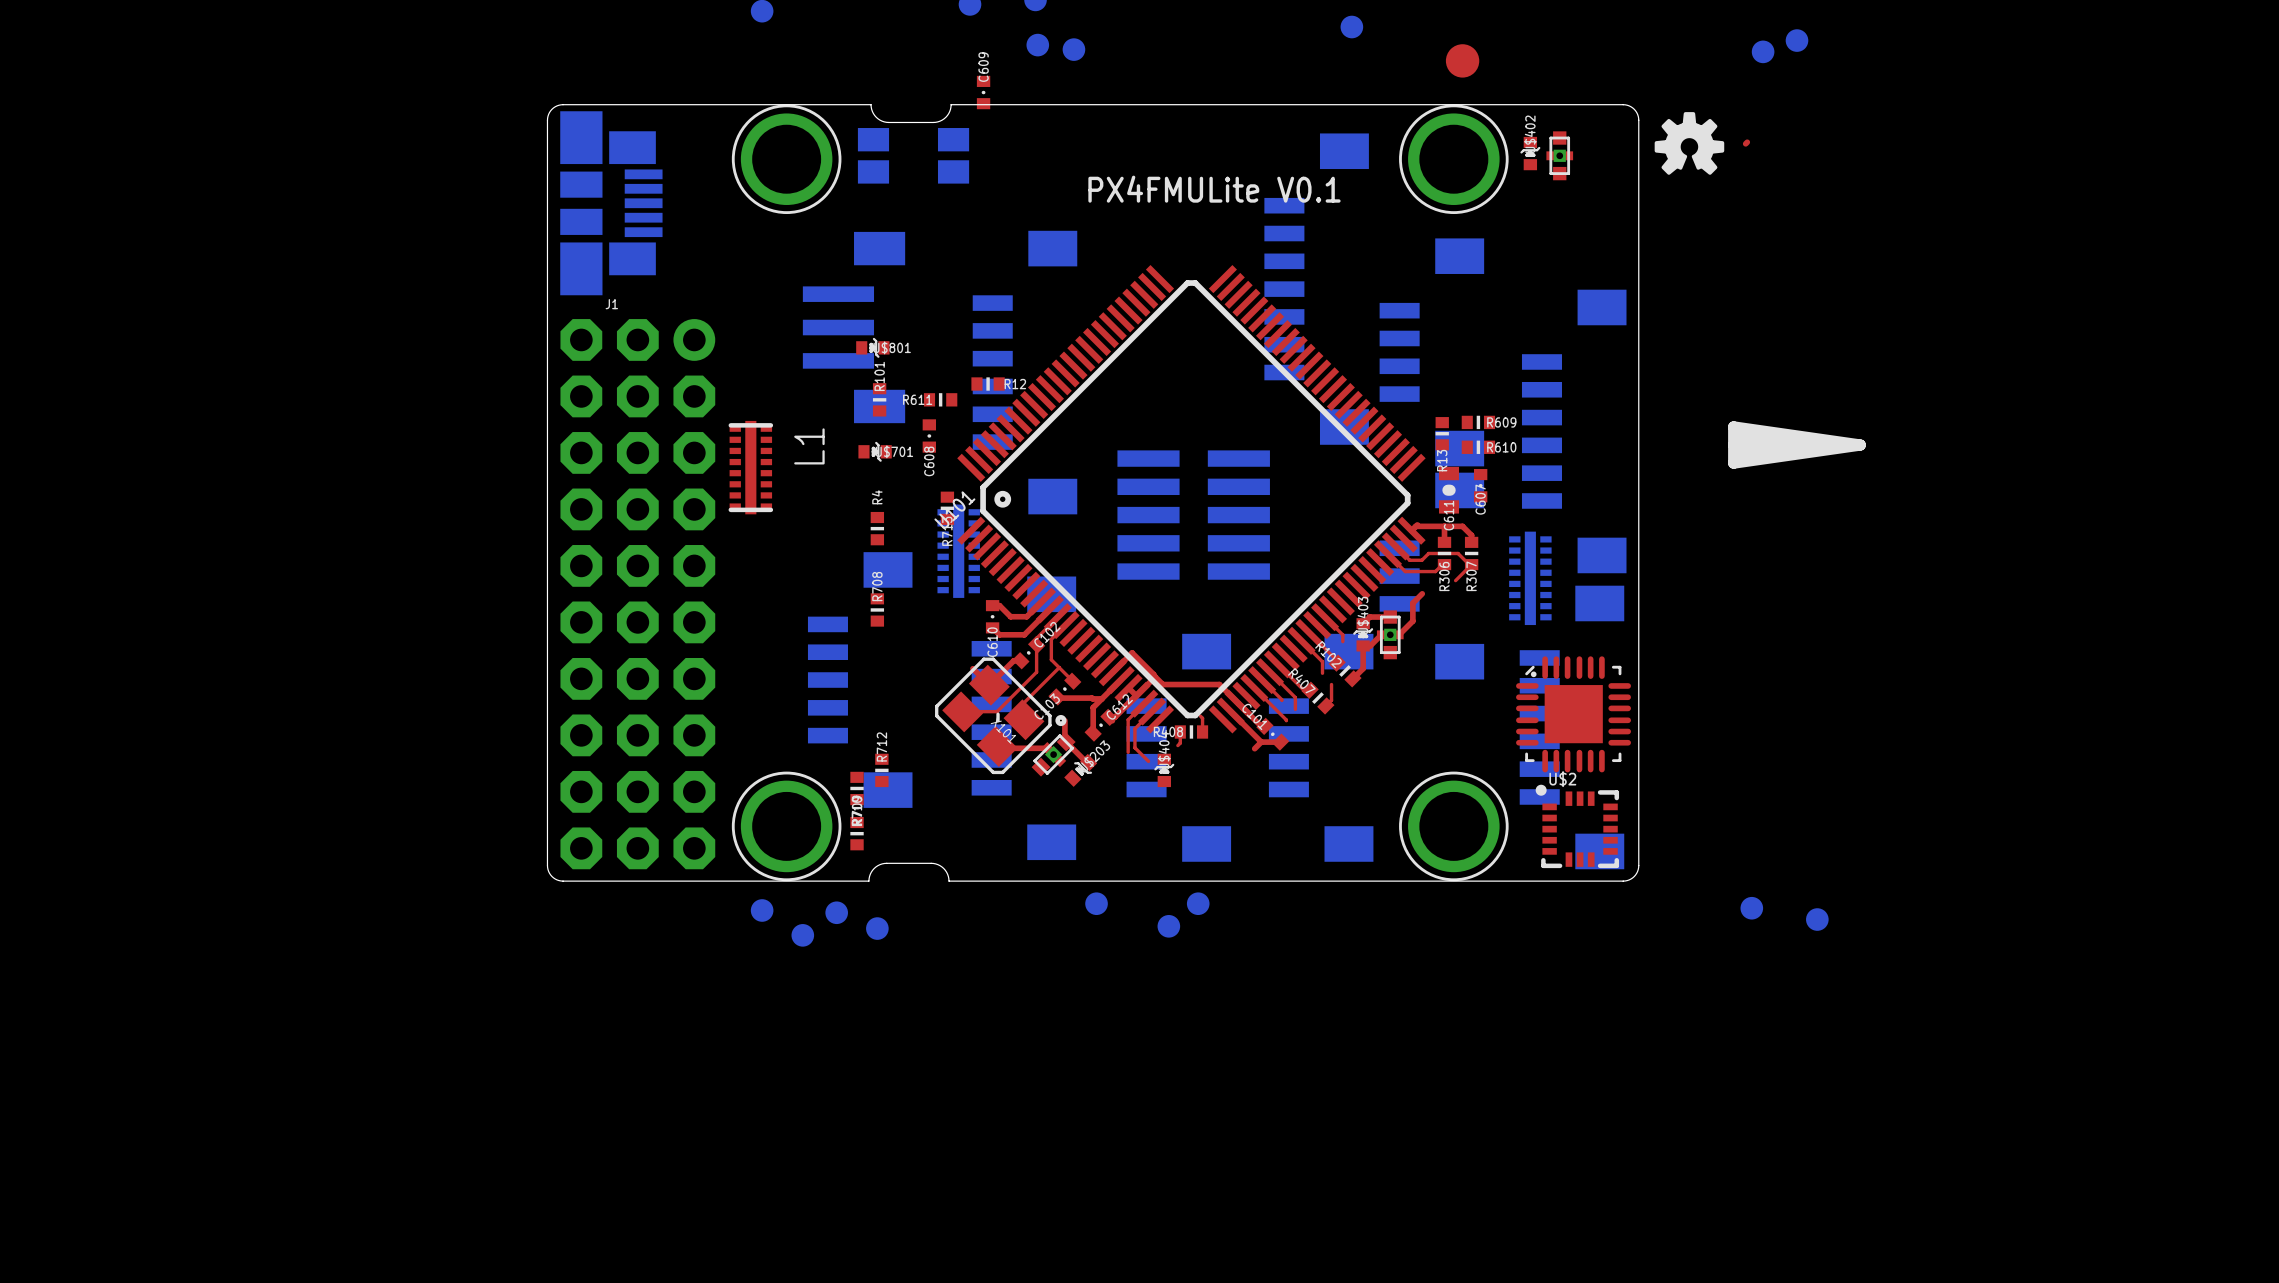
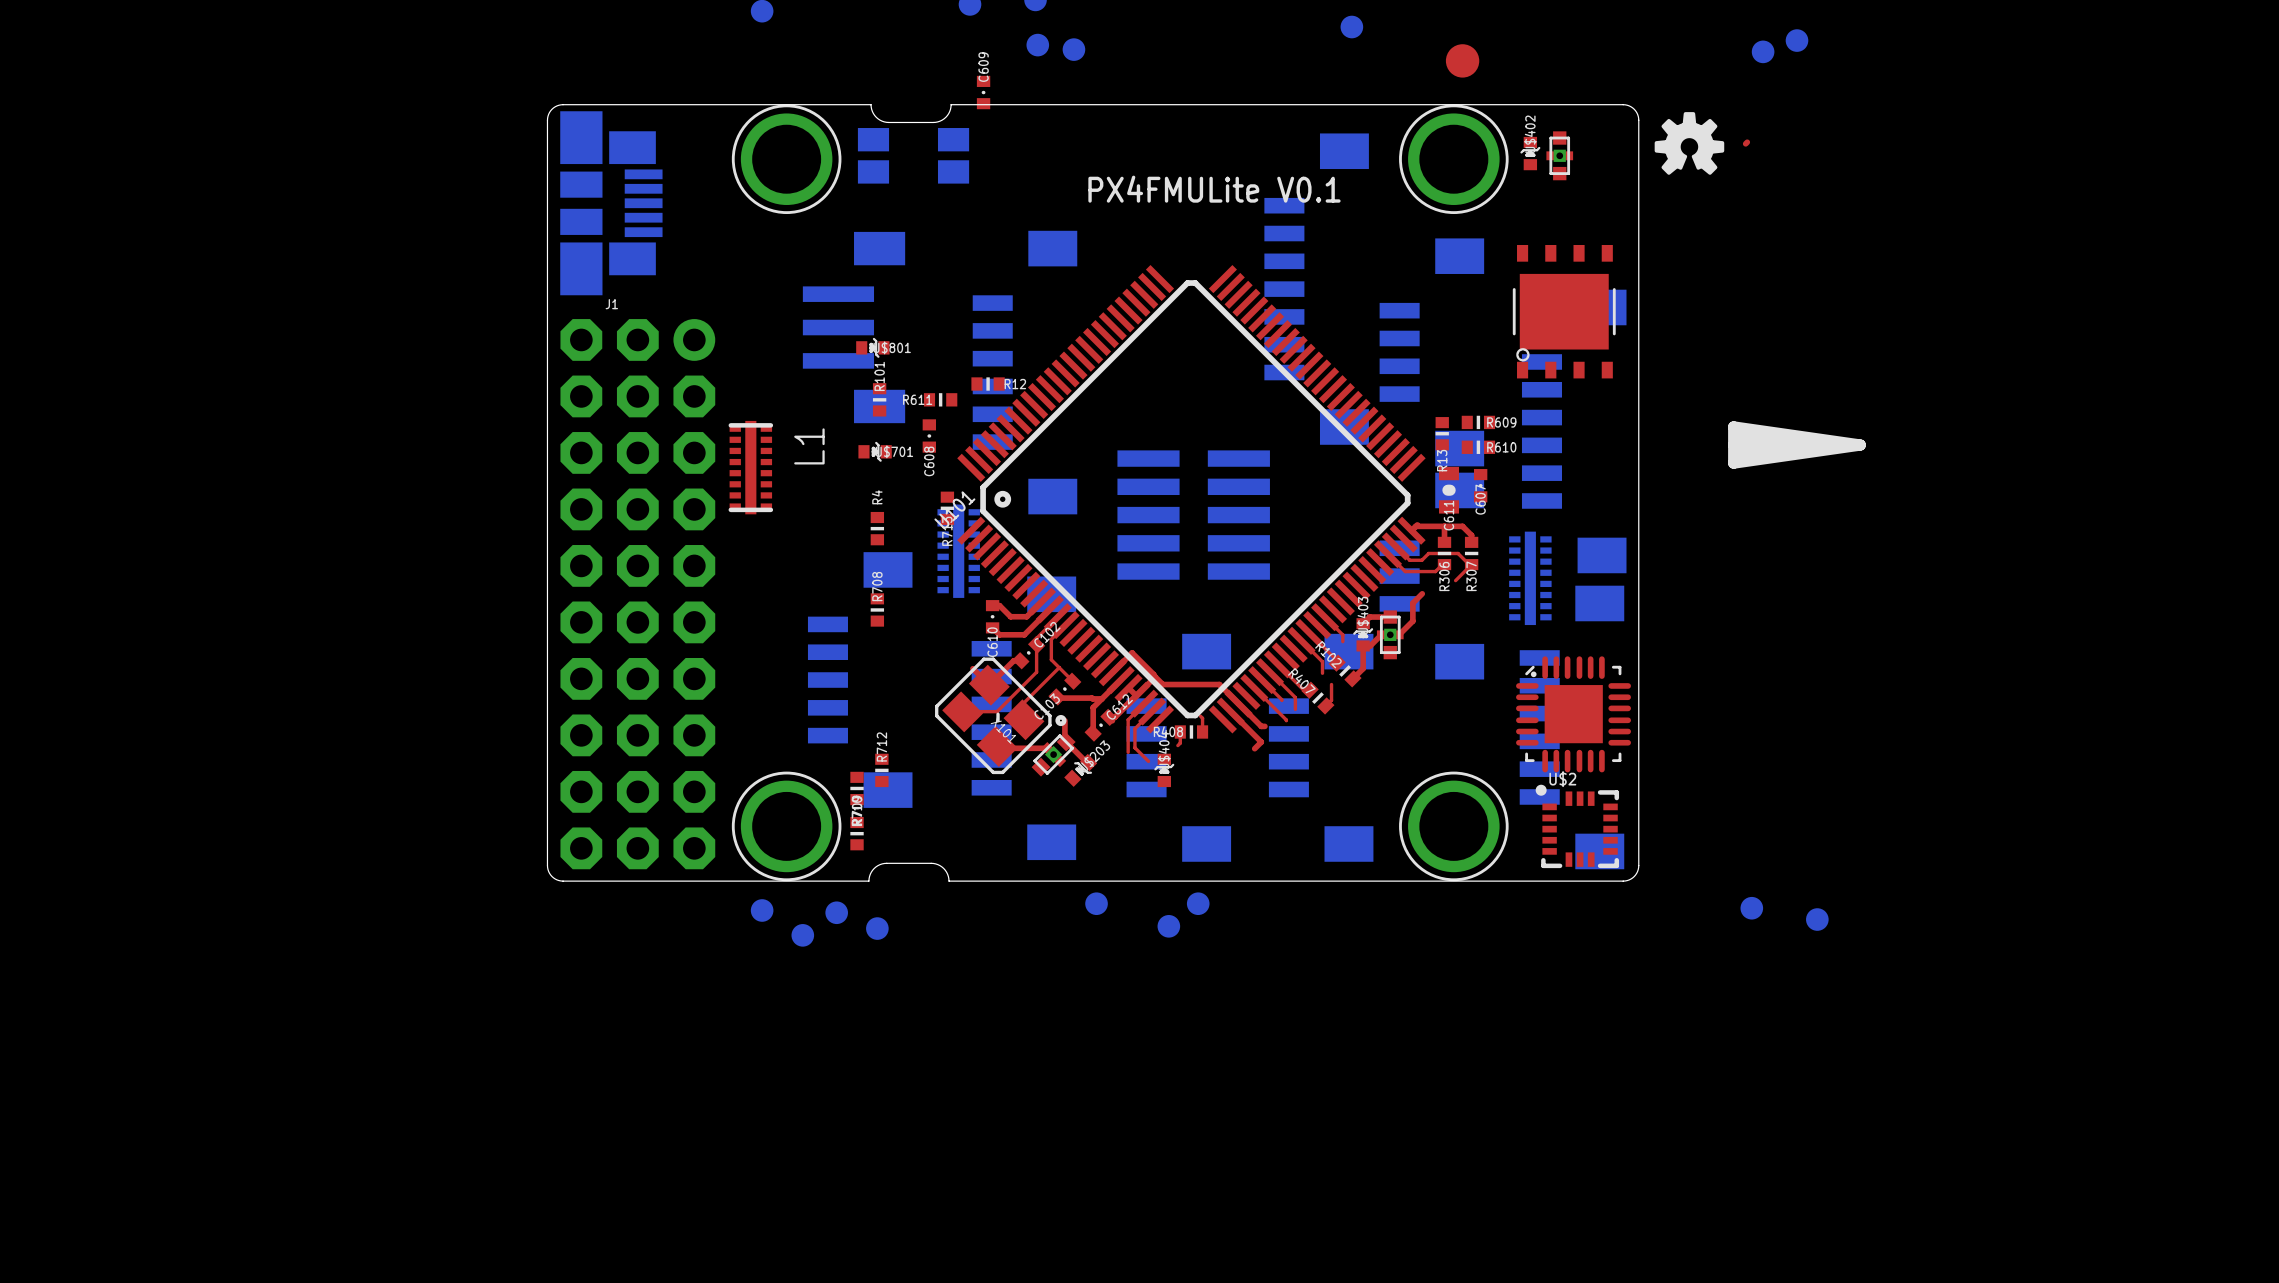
part: none -> (1564, 311)
C101: (1272, 734) -> none
top track: (1261, 742) (1280, 742) -> none

